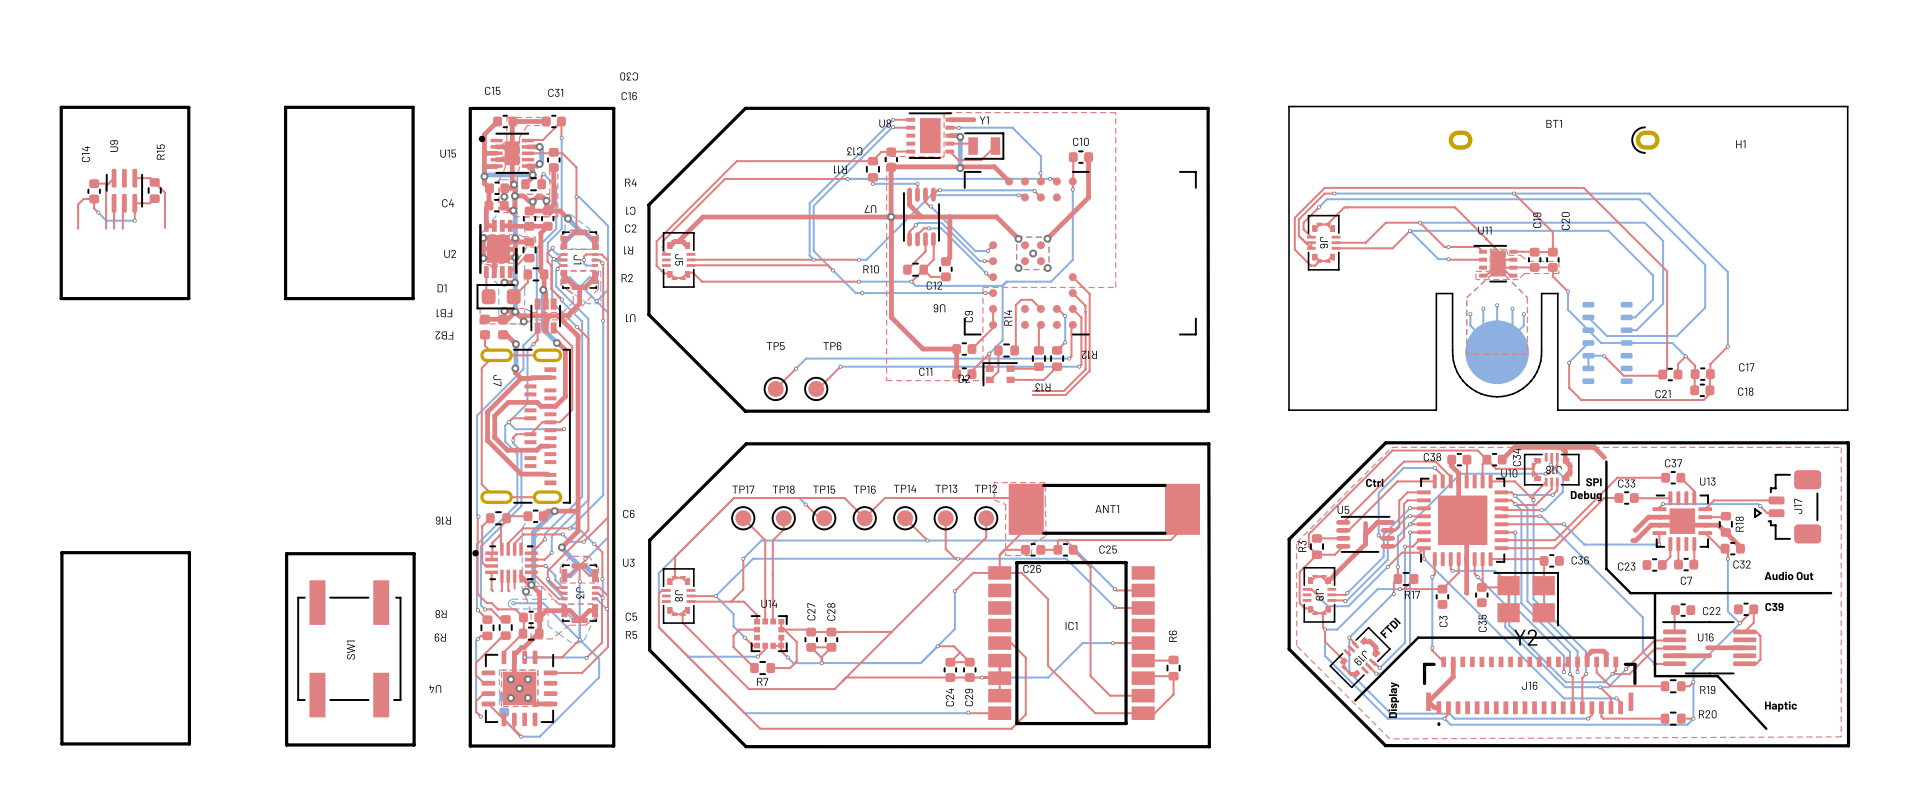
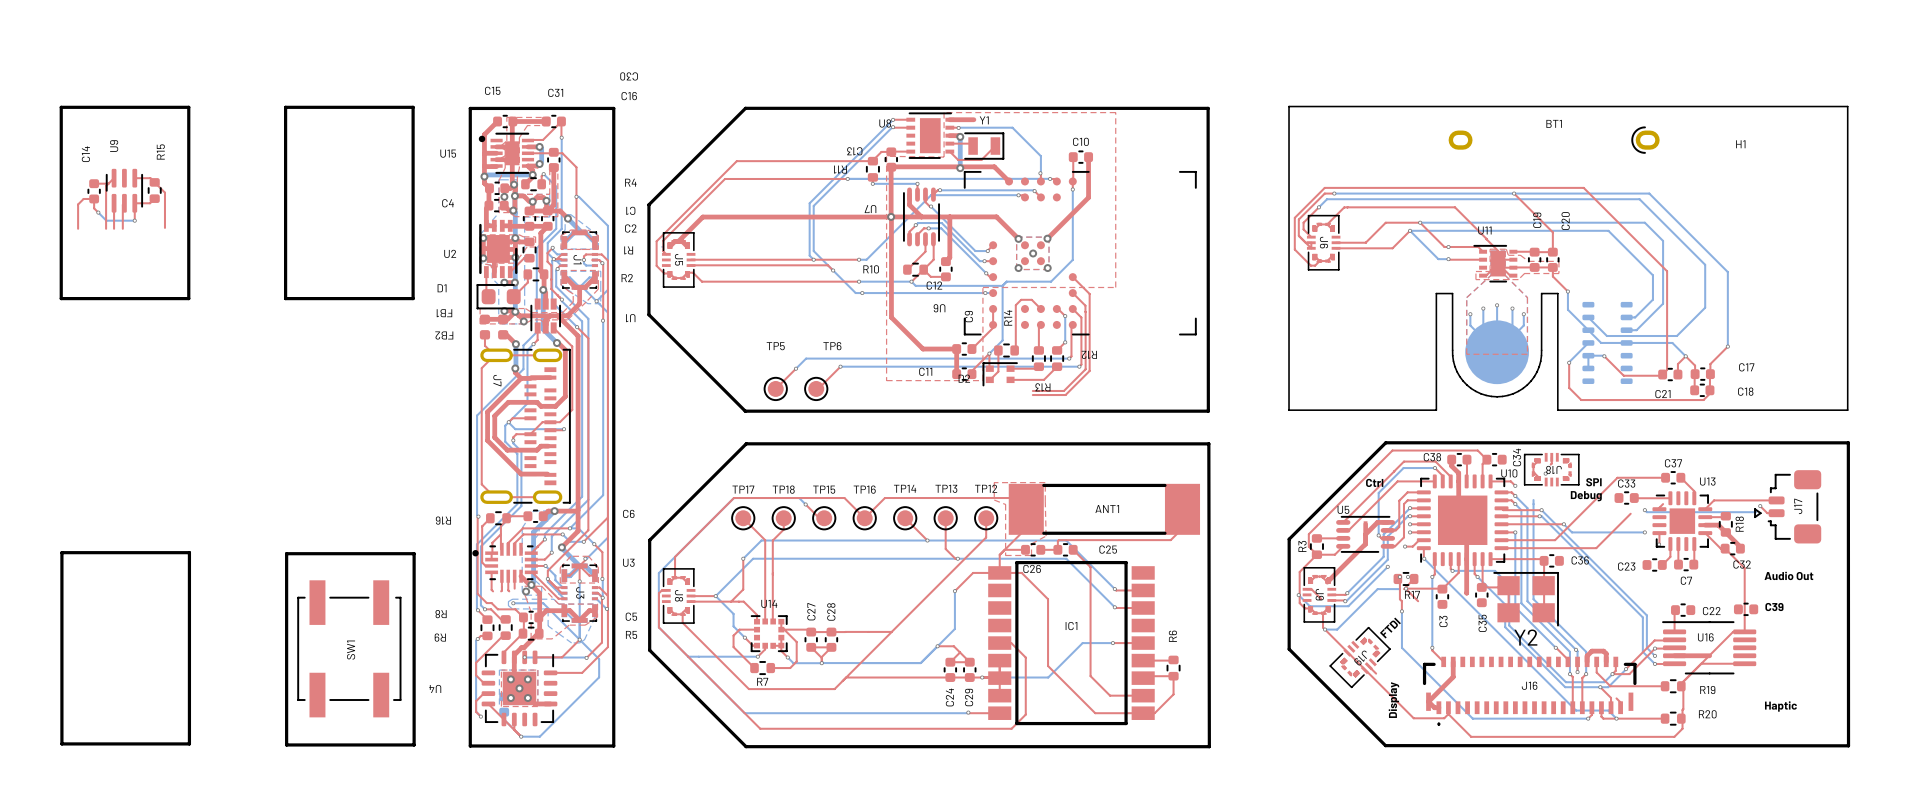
top zone outline: (1391, 447) (1296, 542) (1296, 645) (1389, 738) (1841, 736) (1841, 447) (1391, 447) -> none
top track: (1561, 447) (1565, 451) (1565, 460) (1570, 465) (1570, 473) (1564, 477) -> none
top track: (1557, 457) (1557, 465) (1548, 473) (1545, 473) -> none
top track: (1604, 457) (1594, 447) (1514, 447) (1502, 459) -> none
top track: (1486, 459) (1496, 468) (1533, 467) -> none
line: (1606, 461) (1606, 568) (1630, 593) (1831, 593) -> none
bottom track: (1550, 464) (1562, 476) (1562, 491) (1544, 510) (1541, 510) -> (1654, 655) (1646, 647) (1646, 615) (1541, 510)
via: (1550, 464) -> none
bottom track: (1545, 473) (1460, 473) (1397, 536) (1397, 566) -> none
top track: (1510, 481) (1514, 481) (1533, 500) (1533, 494) (1546, 482) -> (1510, 481) (1515, 485)
top track: (1551, 482) (1551, 488) (1535, 505) (1515, 504) -> none
top track: (1557, 482) (1557, 490) (1552, 494) -> none
via: none -> (1515, 485)
bottom track: (1552, 494) (1515, 495) -> none
via: (1552, 494) -> none
top track: (1618, 498) (1604, 498) (1554, 548) -> (1630, 513) (1596, 548) (1554, 548)
via: (1533, 500) -> none
bottom track: (1663, 504) (1758, 504) (1760, 506) -> none
via: (1663, 504) -> none
bottom track: none -> (1644, 510) (1646, 512) (1756, 512)
via: none -> (1644, 510)
top track: (1682, 521) (1678, 525) (1651, 525) (1635, 540) (1632, 540) -> none
top track: (1705, 525) (1686, 525) (1678, 517) (1648, 517) (1635, 530) -> none
bottom track: (1410, 532) (1410, 644) (1381, 673) (1376, 673) -> none
bottom track: (1571, 532) (1584, 544) (1659, 544) -> (1571, 532) (1644, 532)
via: none -> (1644, 532)
bottom track: (1404, 546) (1404, 642) (1379, 668) -> none
top track: (1423, 548) (1419, 552) (1401, 552) (1387, 566) -> none
top track: (1727, 551) (1727, 558) -> (1727, 551) (1744, 568) (1744, 631) (1733, 631) (1683, 681) (1682, 728) (1674, 736) (1471, 736) (1448, 714)
bottom track: (1727, 558) (1727, 611) (1739, 623) (1693, 670) (1693, 718) (1687, 724) (1450, 724) (1444, 718) (1387, 718) (1325, 655) (1325, 629) -> none
via: (1727, 558) -> none
top track: (1397, 566) (1397, 578) (1393, 582) (1393, 594) -> none
via: (1397, 566) -> none
top track: none -> (1399, 576) (1401, 611)
via: none -> (1399, 576)
via: none -> (1408, 576)
via: none -> (1406, 588)
top track: (1399, 589) (1442, 589) -> (1418, 601) (1406, 588) (1442, 589)
via: (1399, 589) -> none
line: (1654, 593) (1654, 676) (1717, 676) (1766, 728) -> none
bottom track: (1393, 594) (1349, 637) (1349, 672) (1390, 713) (1449, 713) (1454, 718) (1472, 718) -> (1401, 611) (1401, 647) (1472, 718)
via: (1393, 594) -> none
bottom track: (1320, 599) (1328, 606) -> (1298, 595) (1309, 606) (1328, 606)
via position: (1320, 599) -> (1298, 595)
via: none -> (1401, 611)
top track: (1739, 623) (1753, 609) (1753, 622) (1744, 631) -> none
via: (1739, 623) -> none
top track: (1325, 629) (1325, 641) (1344, 660) (1344, 667) (1349, 673) (1356, 672) -> (1325, 629) (1413, 718) (1444, 718)
top track: (1751, 631) (1756, 631) (1760, 636) (1760, 659) (1756, 663) (1744, 663) -> (1701, 663) (1744, 663)
top track: (1349, 637) (1355, 644) -> none
via: (1349, 637) -> none
line: (1654, 637) (1418, 637) (1355, 700) -> none
top track: (1363, 641) (1370, 641) (1375, 647) (1374, 654) -> none
bottom track: (1555, 647) (1563, 655) (1563, 672) -> none
via: none -> (1555, 647)
top track: (1707, 647) (1744, 647) -> none
via: none -> (1654, 648)
via: none -> (1576, 649)
via: none -> (1654, 655)
top track: (1567, 661) (1563, 665) (1563, 672) -> (1567, 661) (1555, 647)
top track: (1372, 662) (1379, 668) -> none
via: (1379, 668) -> none
via: (1563, 672) -> none
via: (1376, 673) -> none
top track: (1693, 682) (1689, 686) (1681, 686) -> none
via: (1693, 682) -> none
bottom track: (1563, 698) (1616, 698) -> (1563, 698) (1576, 710) (1608, 710) (1616, 718)
via position: (1616, 698) -> (1616, 718)
via: (1444, 718) -> none
top track: (1693, 718) (1683, 718) (1681, 720) -> none
via: (1693, 718) -> none

